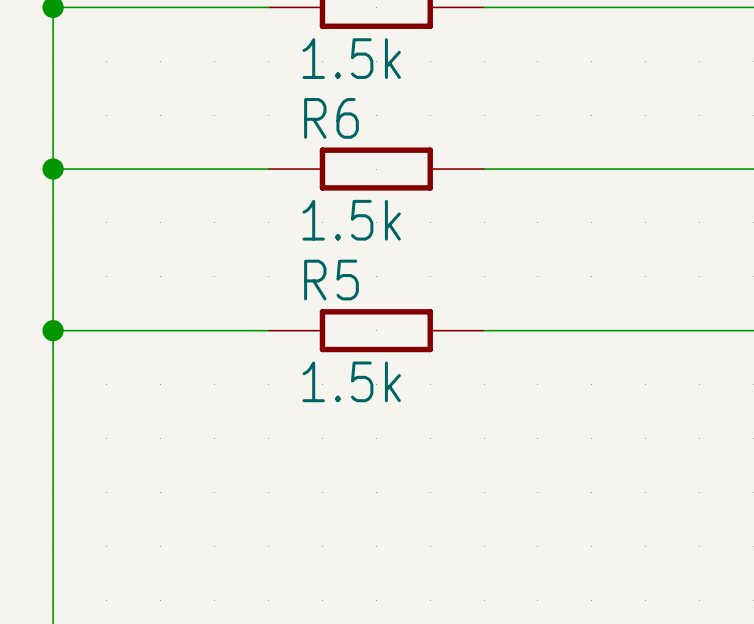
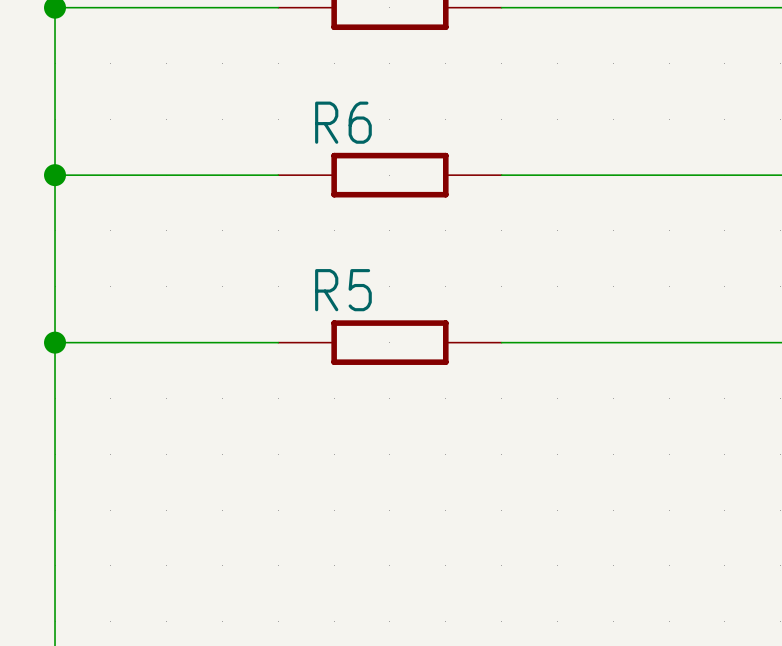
part value: 1.5k (351, 58) -> none
R6 value: 1.5k (351, 220) -> none
R5 value: 1.5k (351, 381) -> none

